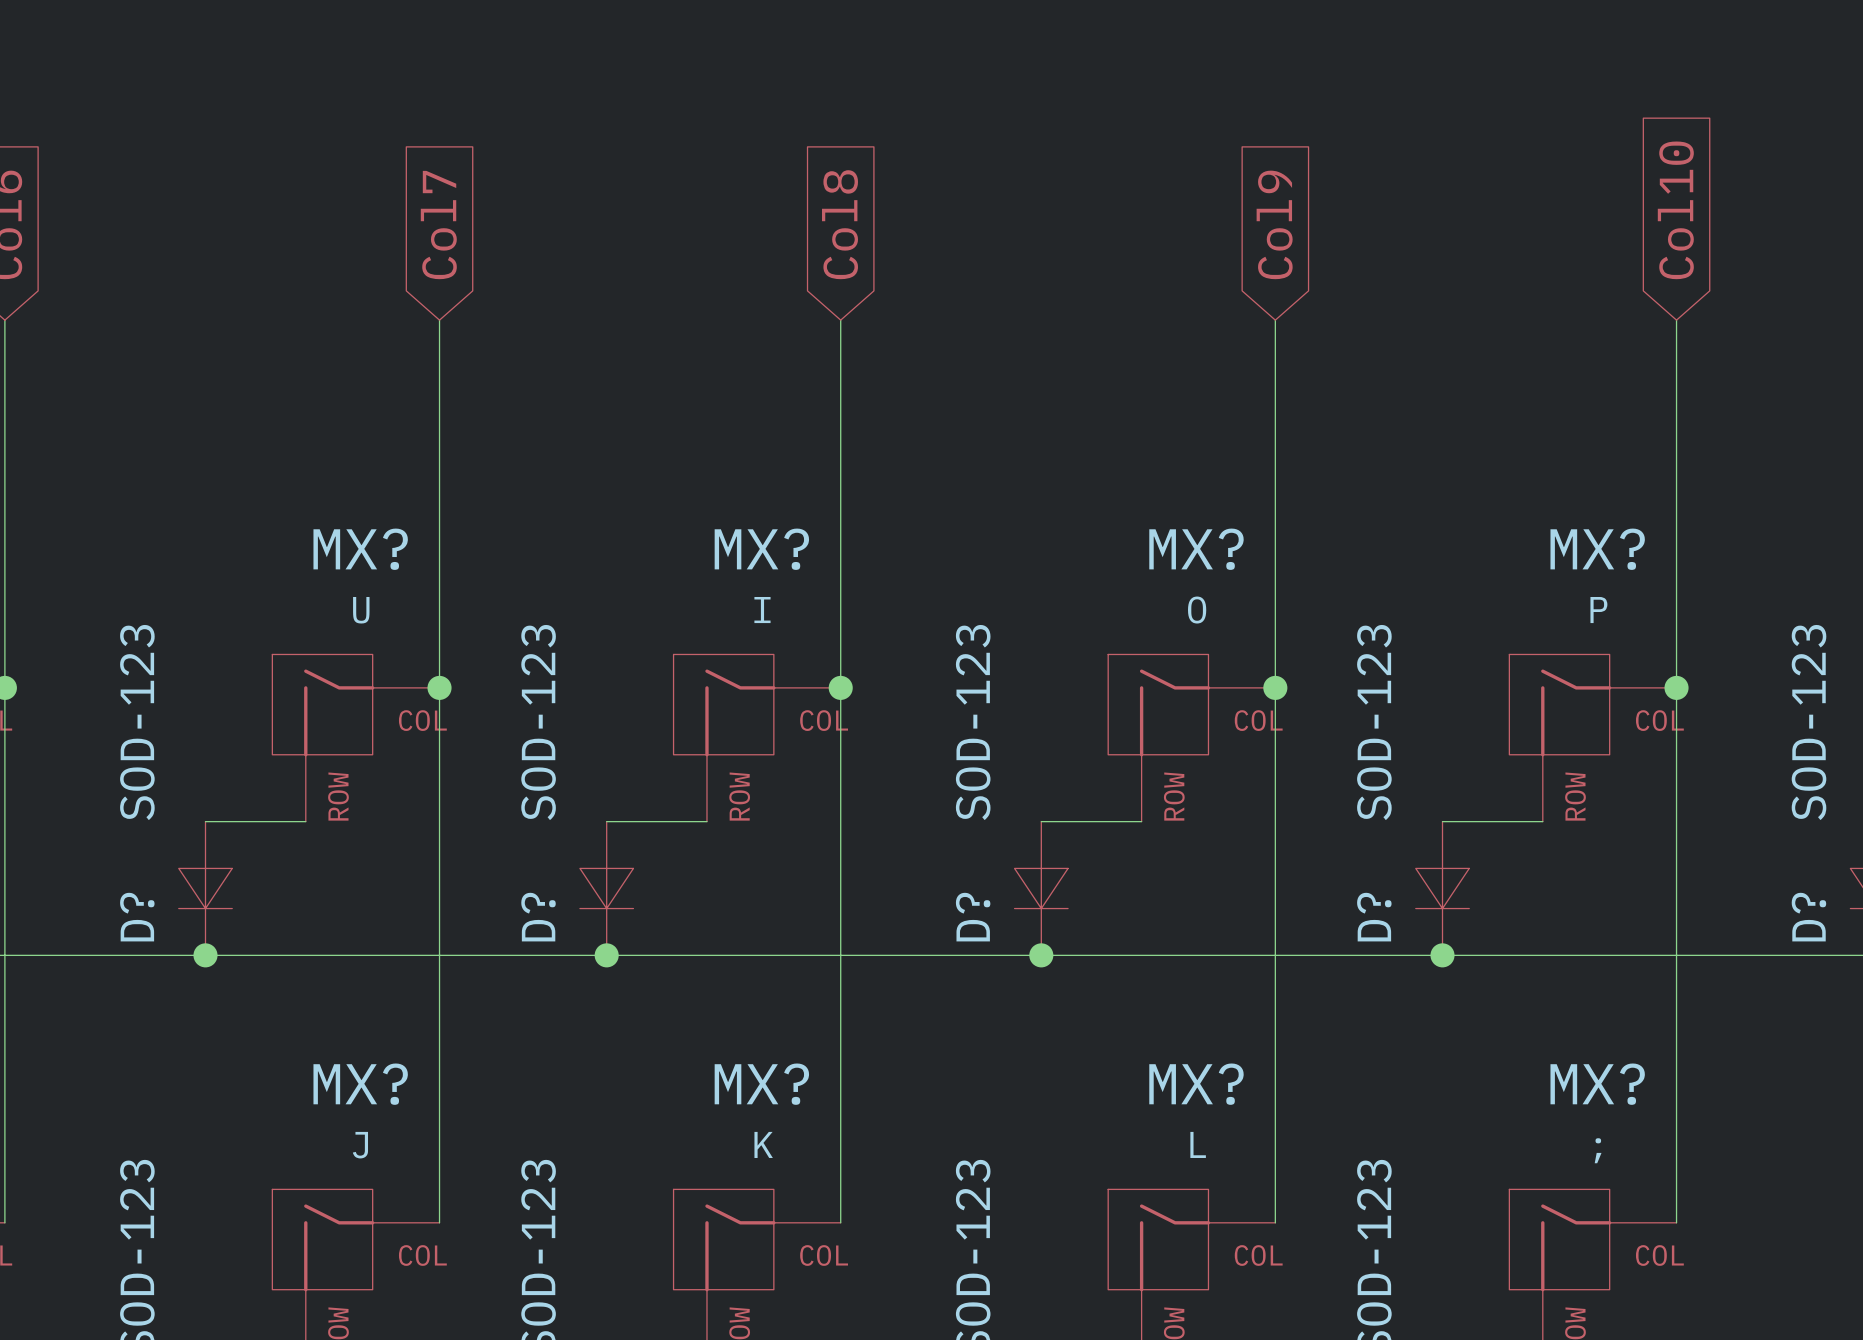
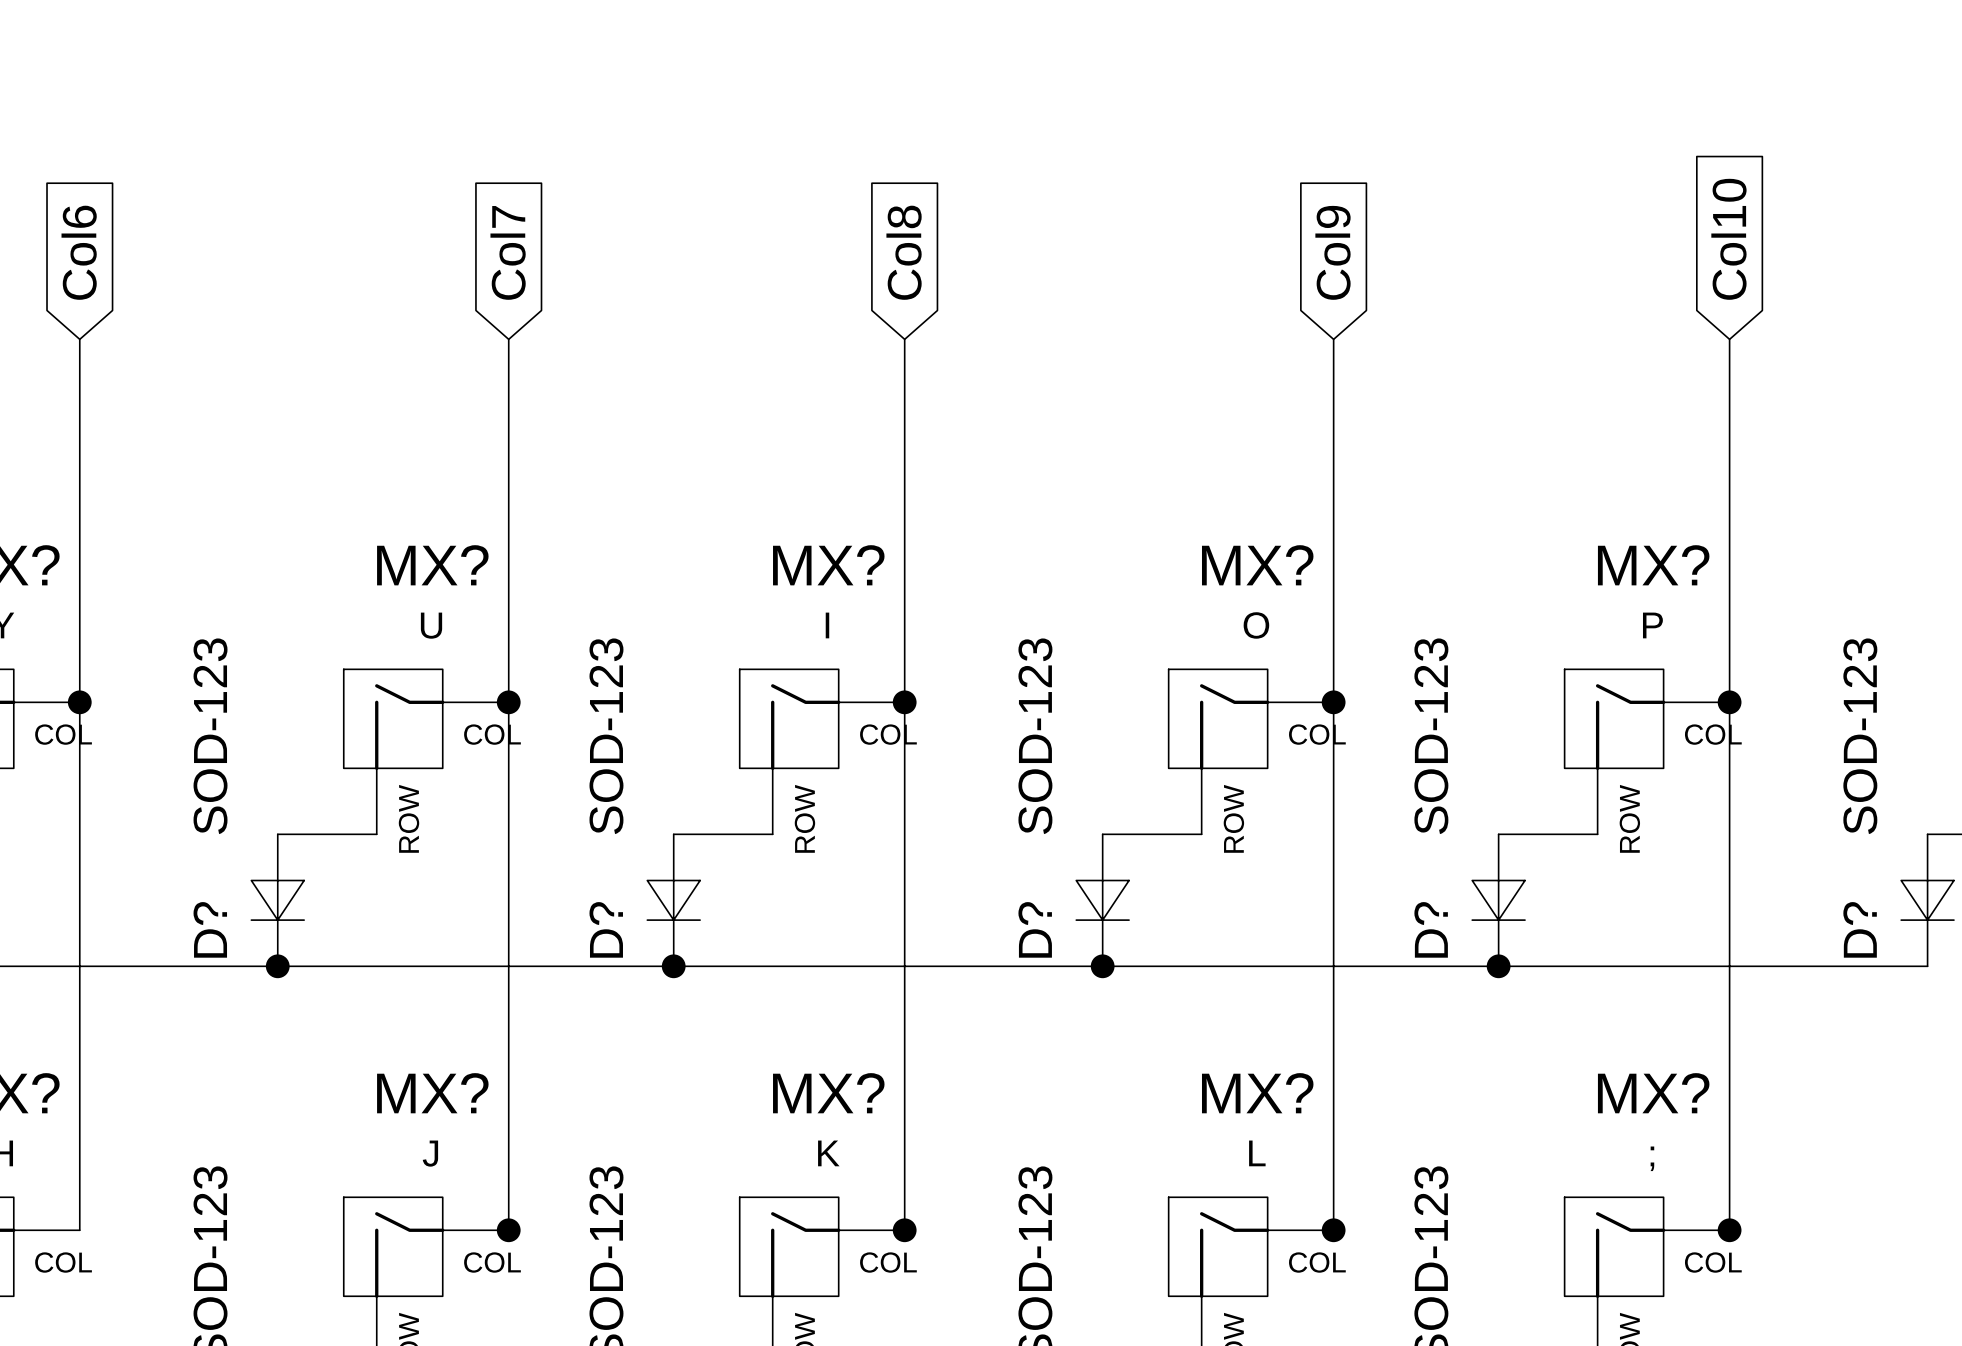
junction: none -> (508, 1230)
junction: none -> (904, 1230)
junction: none -> (1333, 1230)
junction: none -> (1729, 1230)

